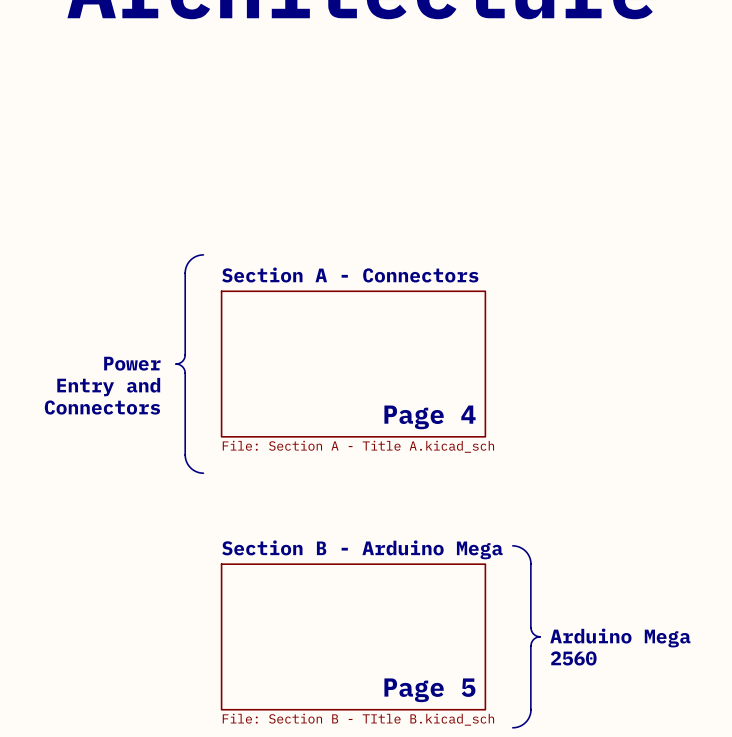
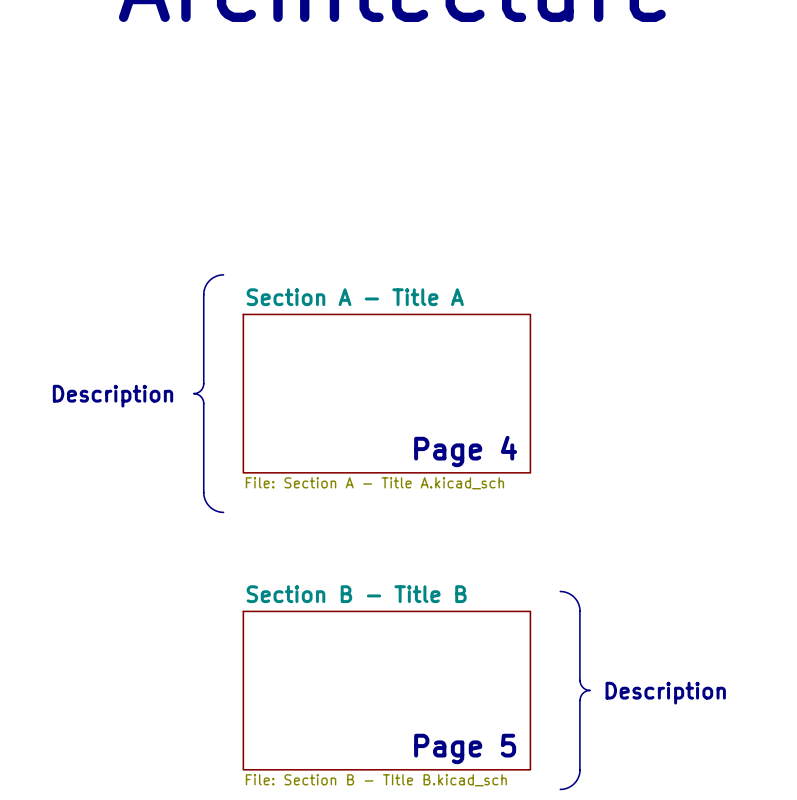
sheet Section A - Connectors name: Section A - Connectors (350, 275) -> Section A - Title A (355, 297)
text: Power (132, 363) -> Description (113, 396)
text: Entry and (108, 387) -> none
text: Connectors (102, 407) -> none
sheet Section B - Arduino Mega name: Section B - Arduino Mega (362, 549) -> Section B - Title B (356, 594)
text: Arduino Mega (620, 638) -> Description (665, 693)
text: 2560 (573, 658) -> none

